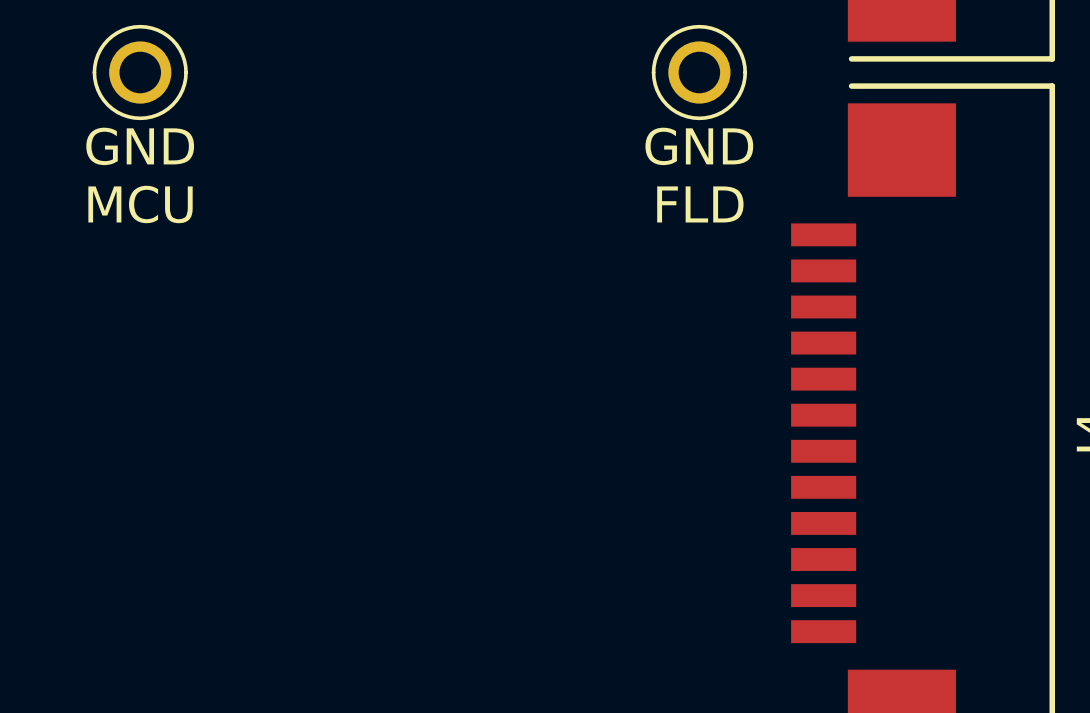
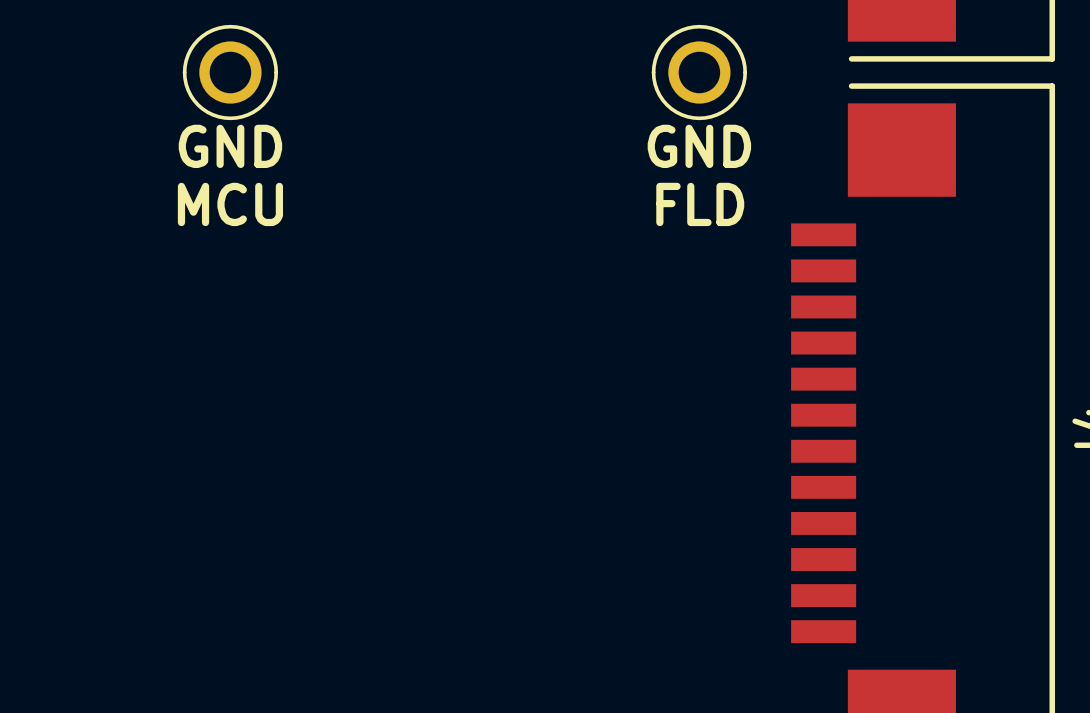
part position: (140, 72) -> (230, 72)
text position: GND (140, 146) -> GND (230, 146)
text position: MCU (140, 204) -> MCU (230, 204)

